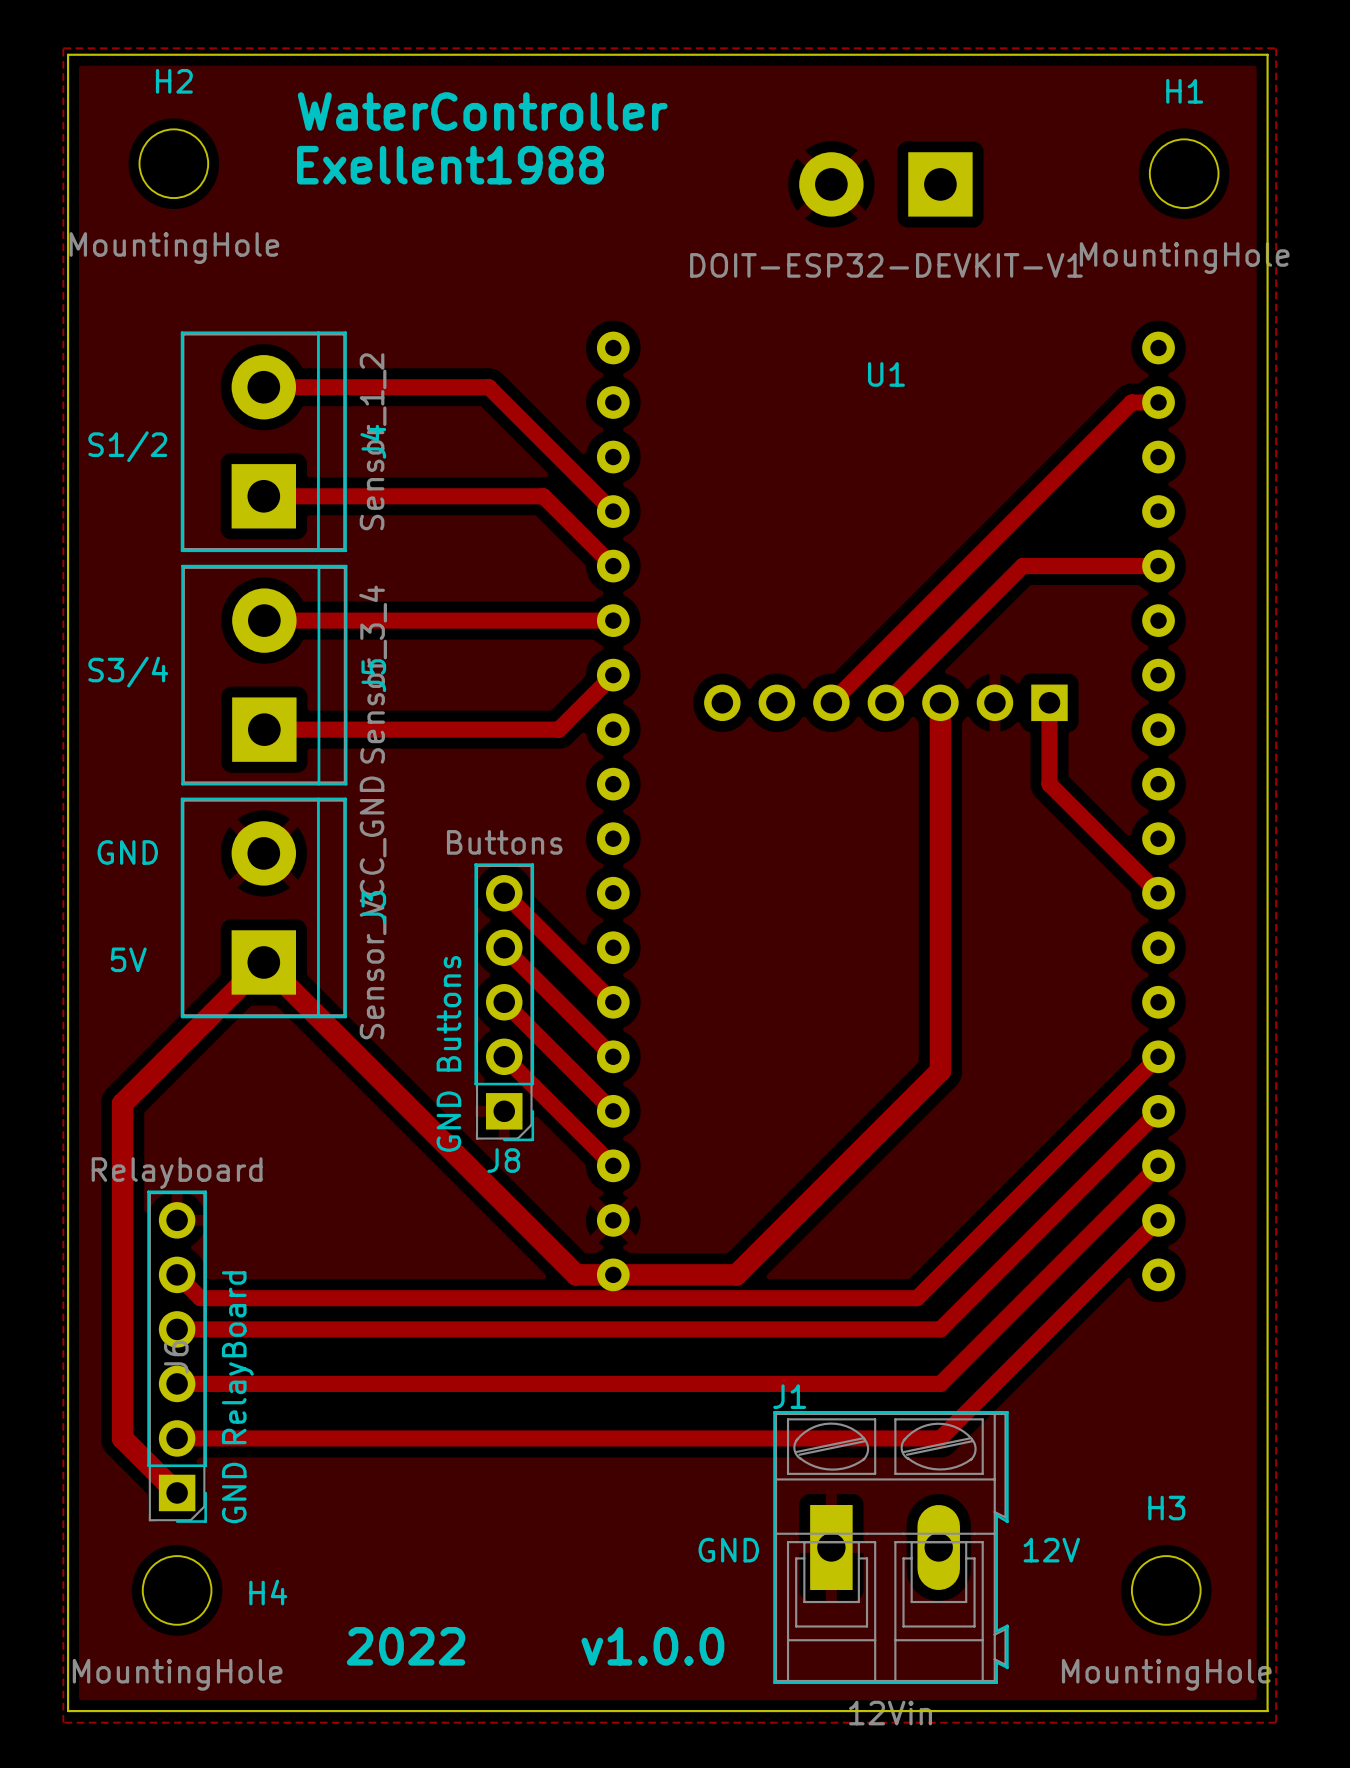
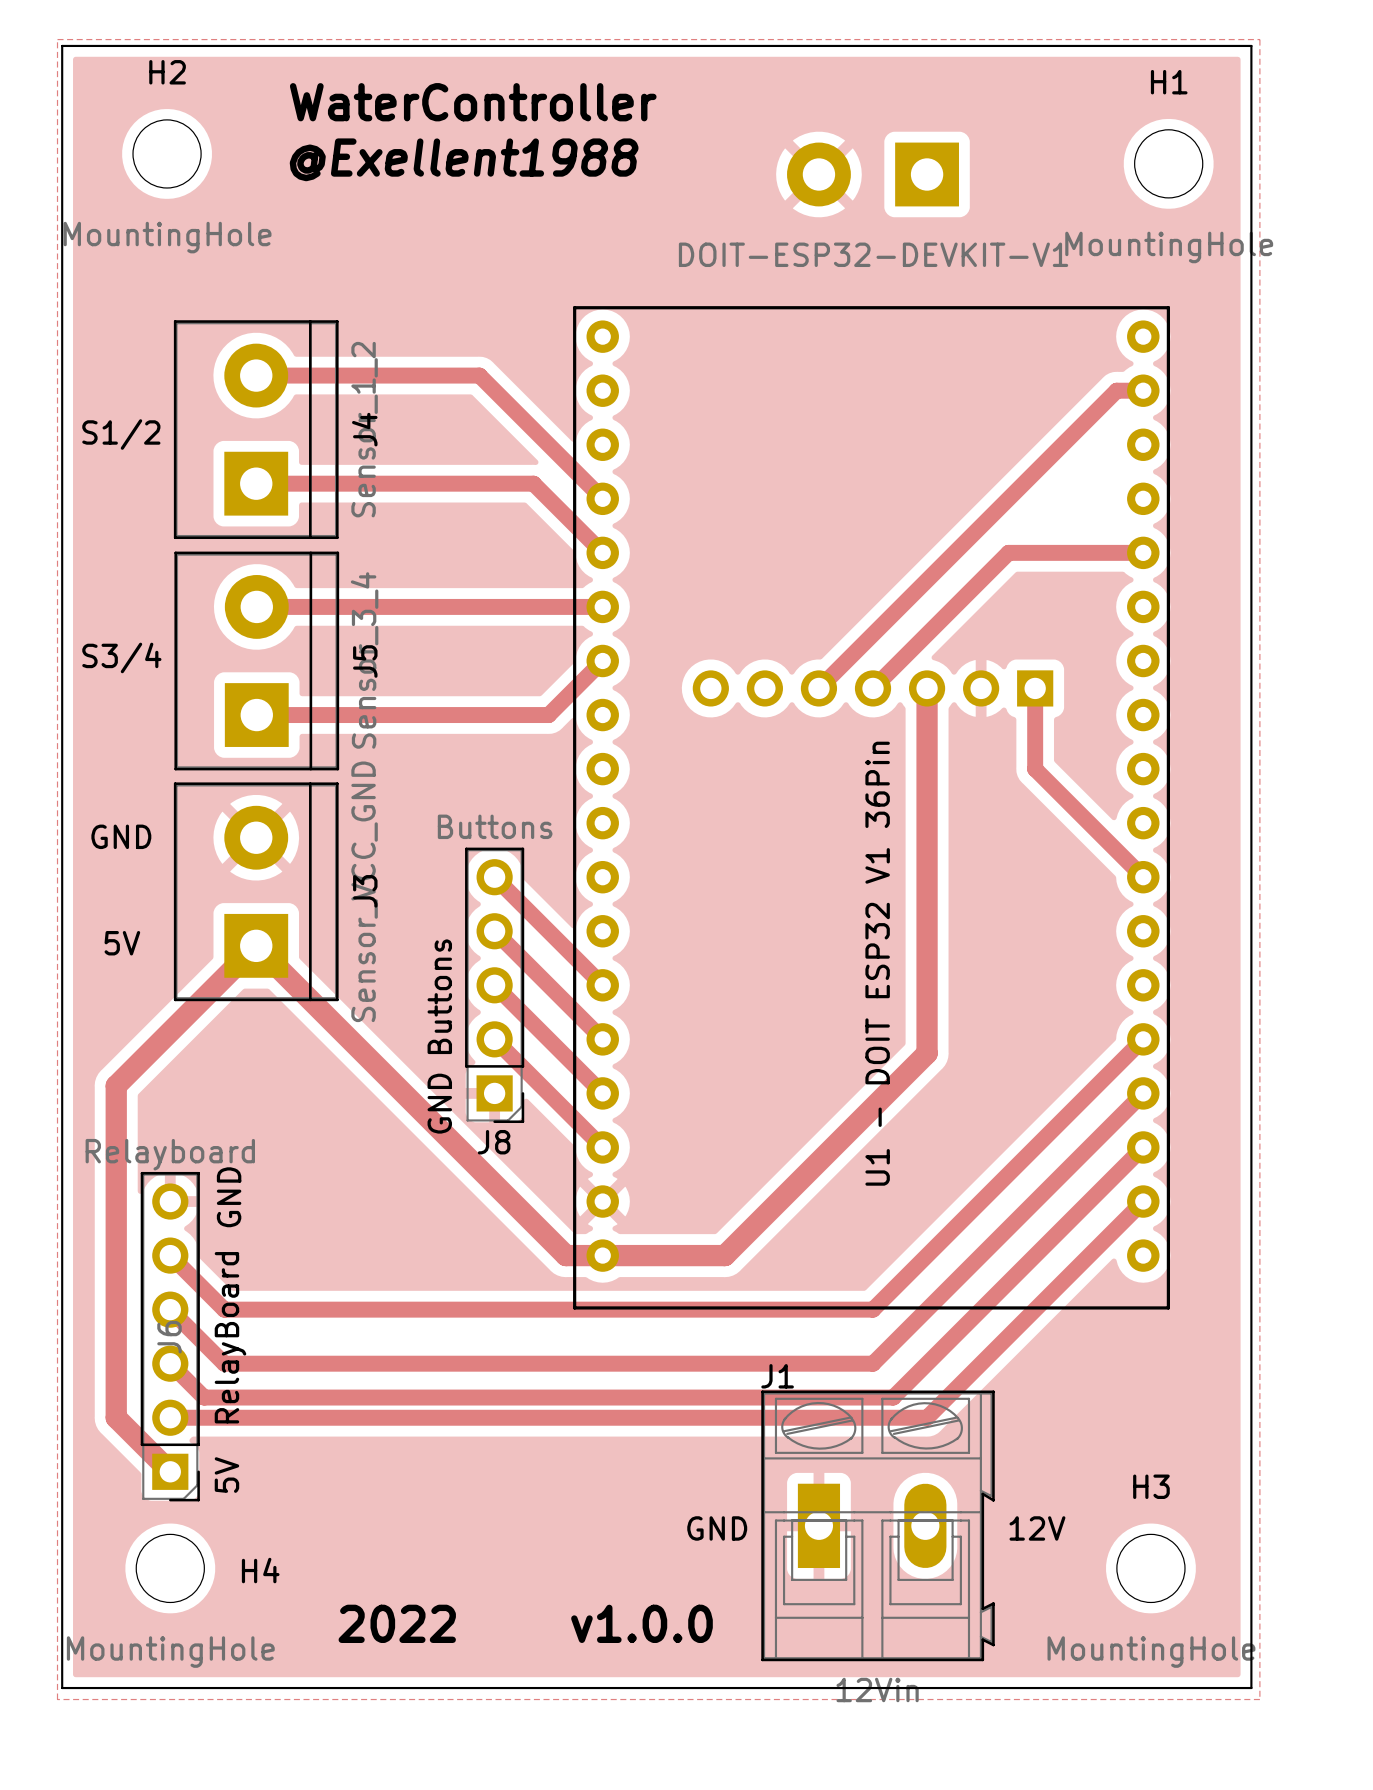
text: Exellent1988 (450, 165) -> @Exellent1988 (464, 159)
line: none -> (574, 307) (1168, 307) (1168, 1307) (574, 1307) (574, 307)
U1 name: U1 (886, 374) -> U1 - DOIT ESP32 V1 36Pin (877, 963)
text: none -> GND (229, 1197)
track: (200, 1298) (917, 1298) -> none
track: (177, 1329) (231, 1329) -> (193, 1278) (224, 1309)
track: (885, 1329) (940, 1329) -> (873, 1309) (903, 1278)
track: (177, 1383) (231, 1383) -> (170, 1309) (224, 1363)
track: none -> (170, 1363) (204, 1397) (893, 1397) (927, 1363)
track: (885, 1383) (940, 1383) -> (873, 1363) (927, 1309)
text: GND (234, 1492) -> 5V (226, 1475)

